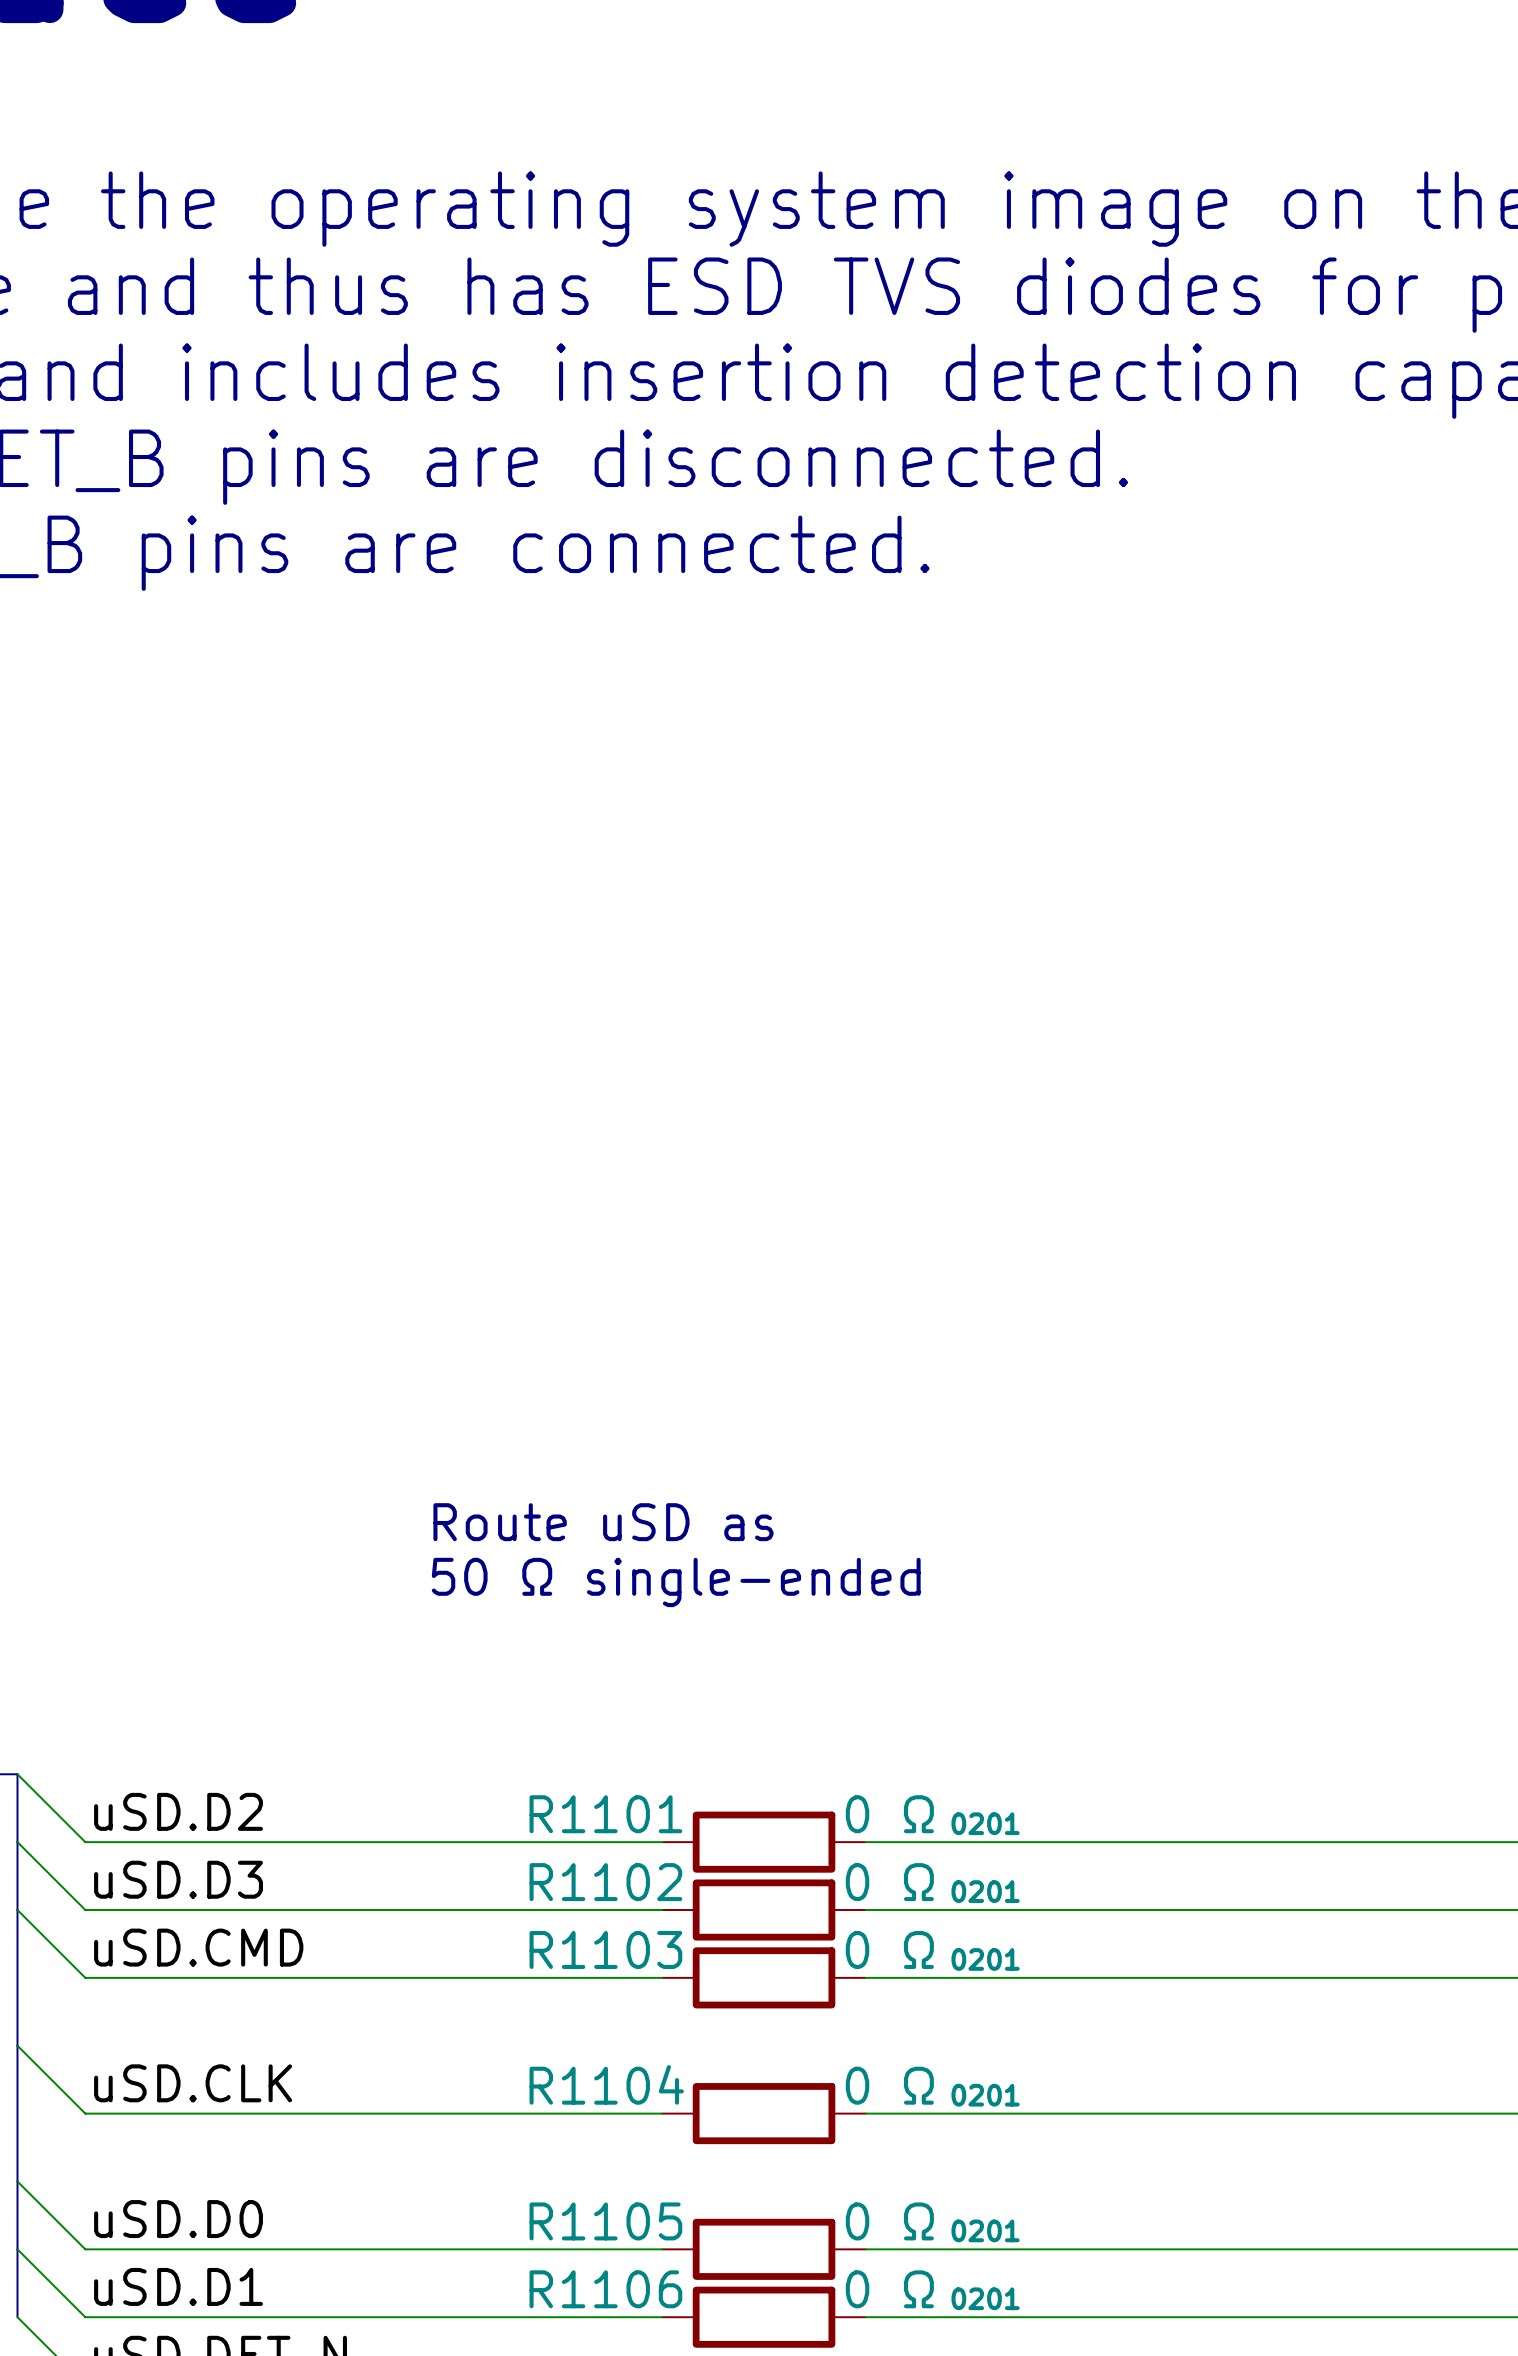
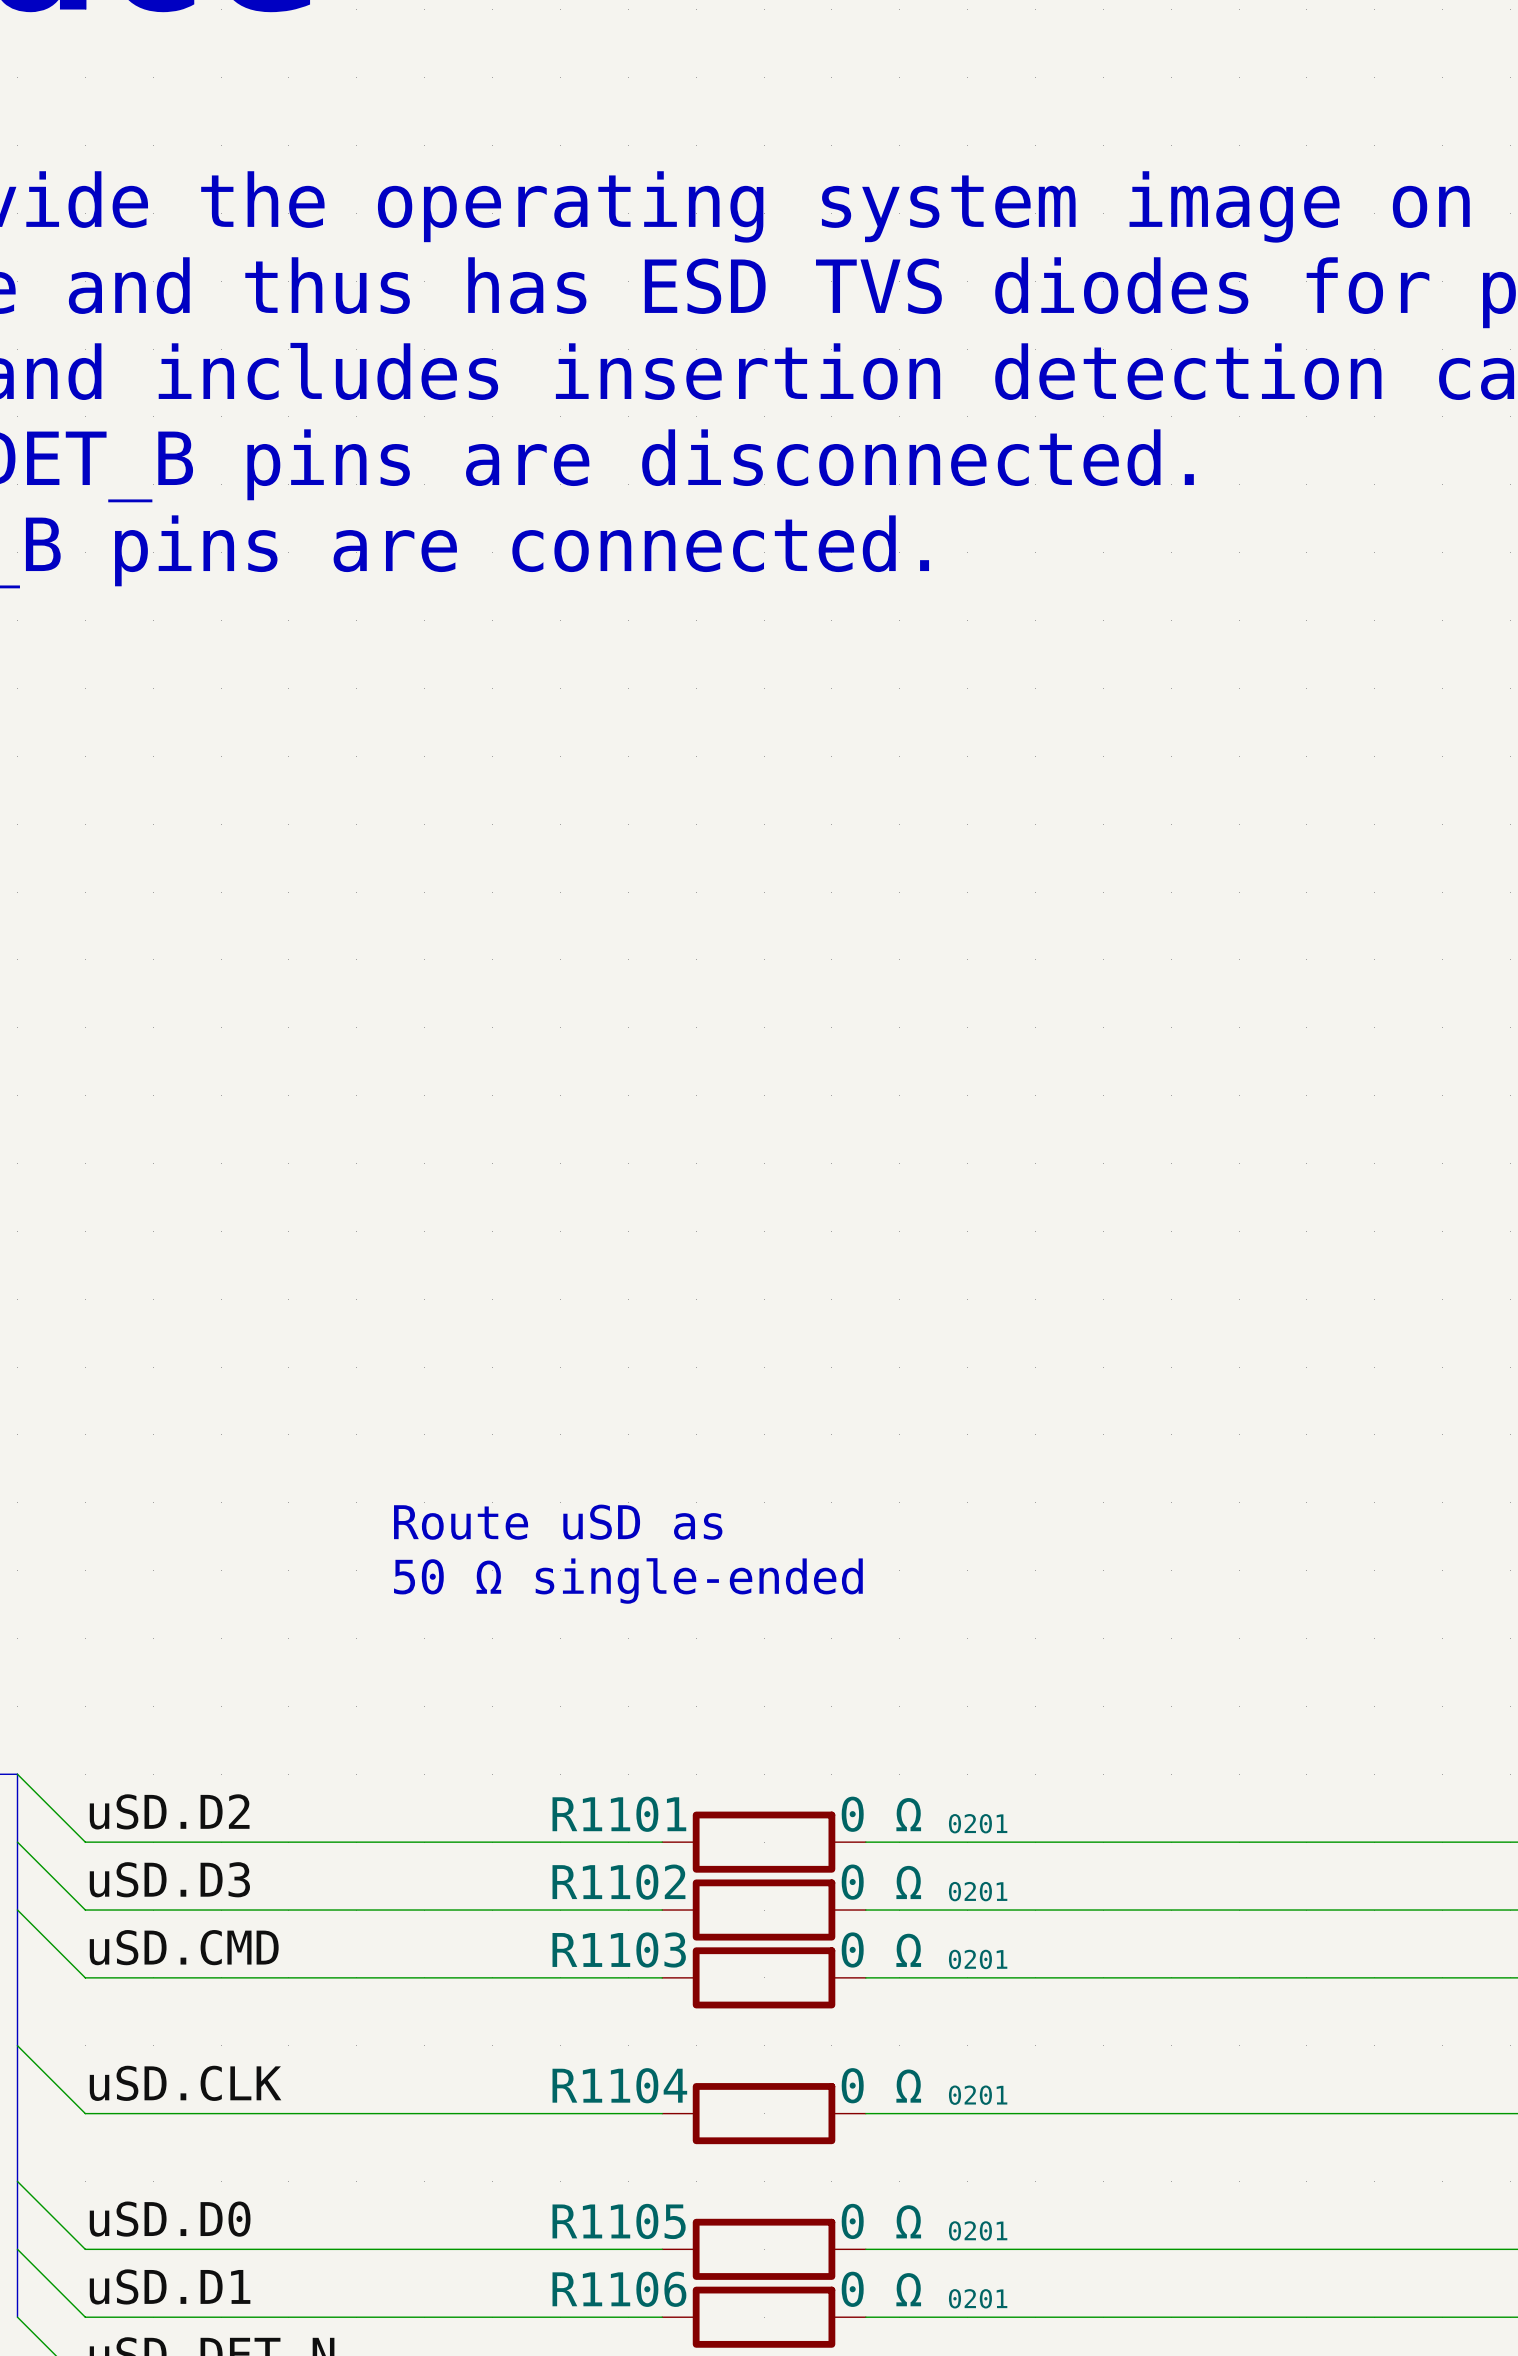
text position: Route uSD as (603, 1522) -> Route uSD as (558, 1522)
text position: 50 Ω single-ended (676, 1582) -> 50 Ω single-ended (628, 1580)

